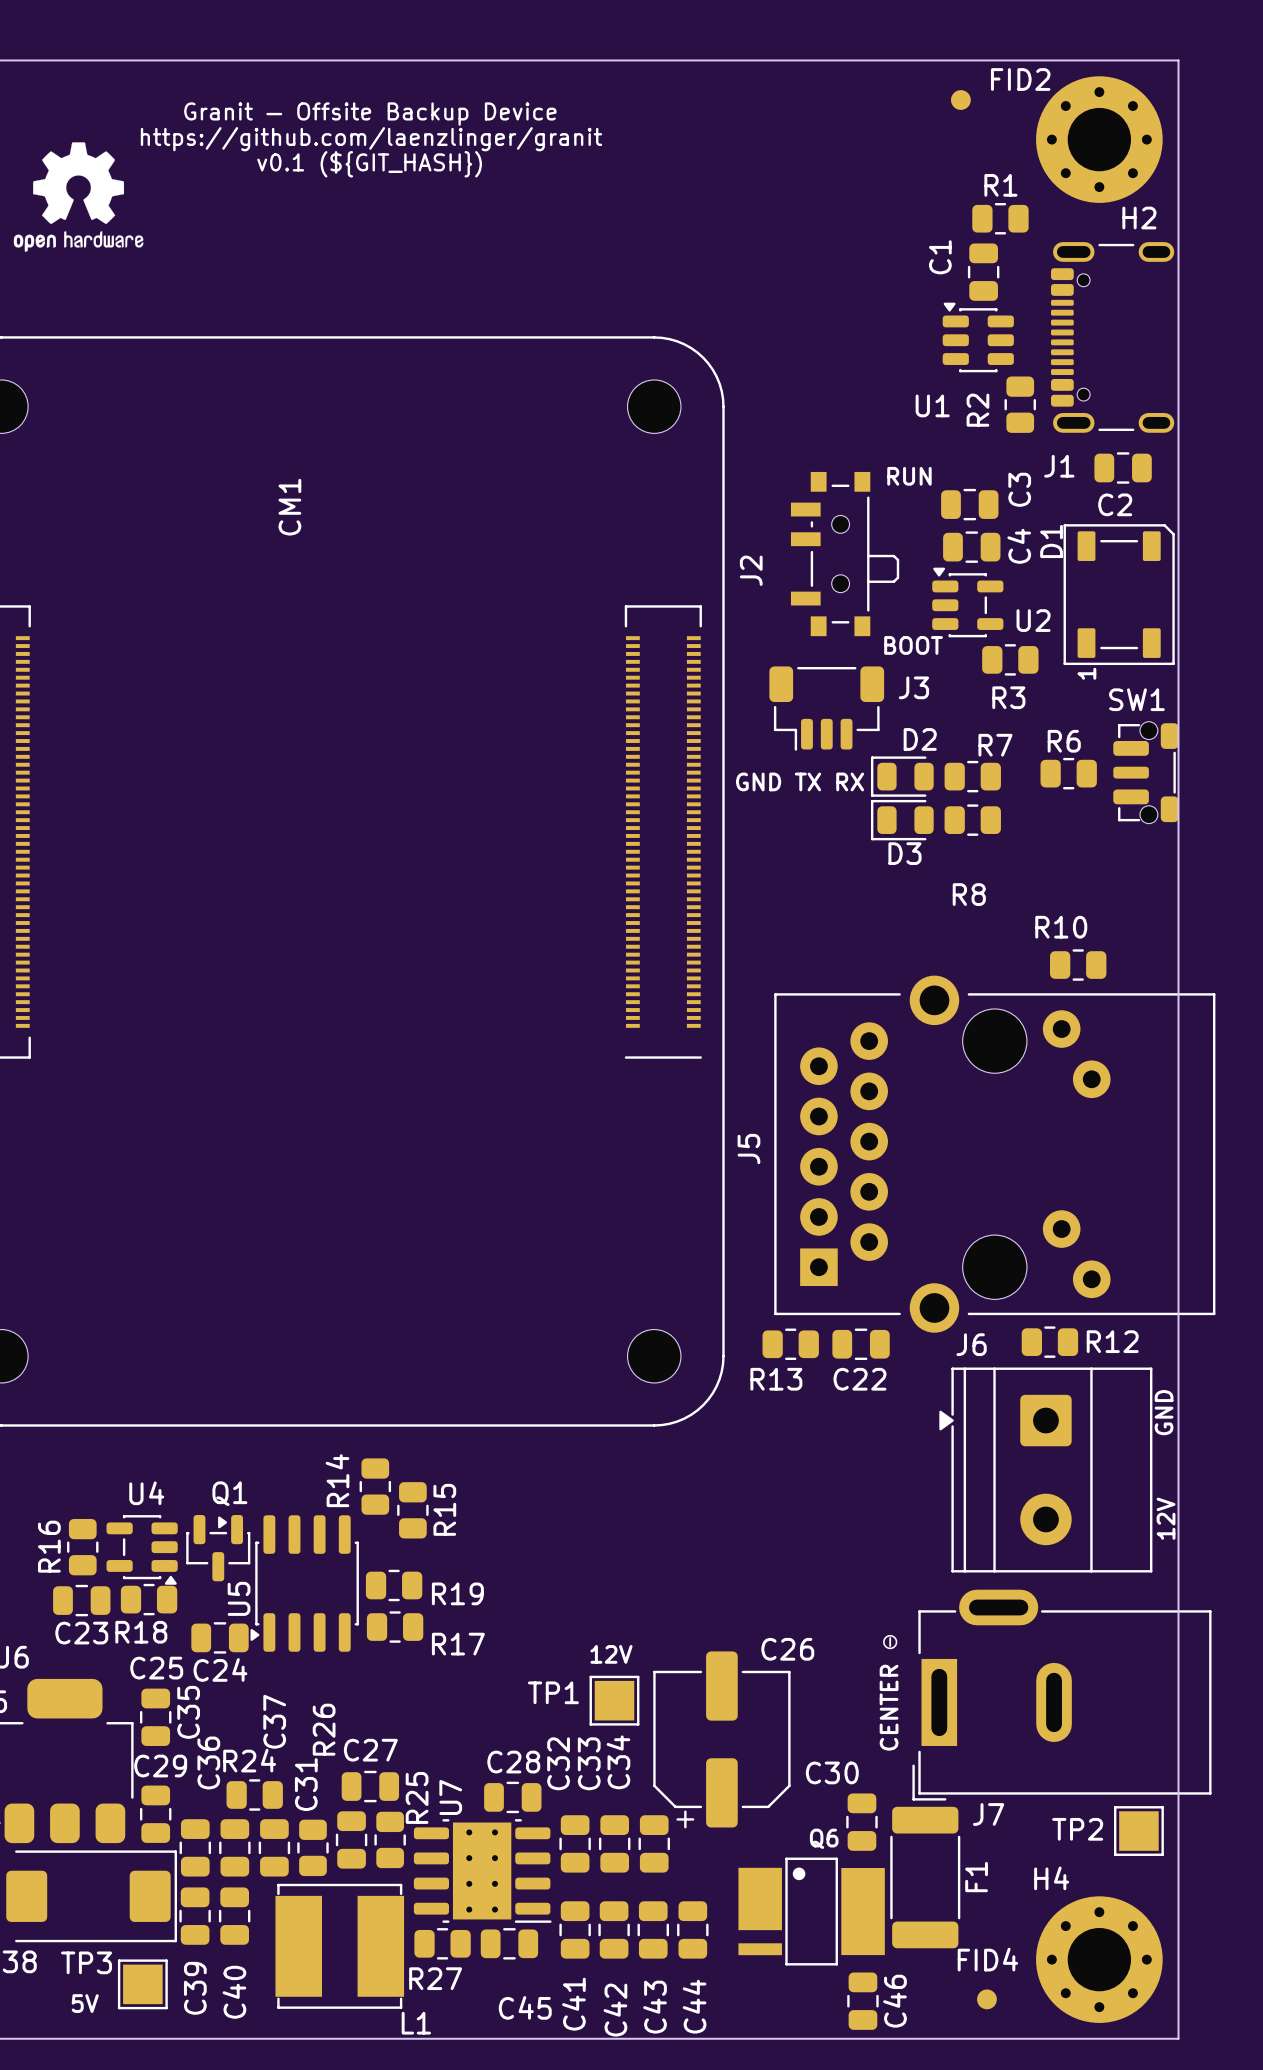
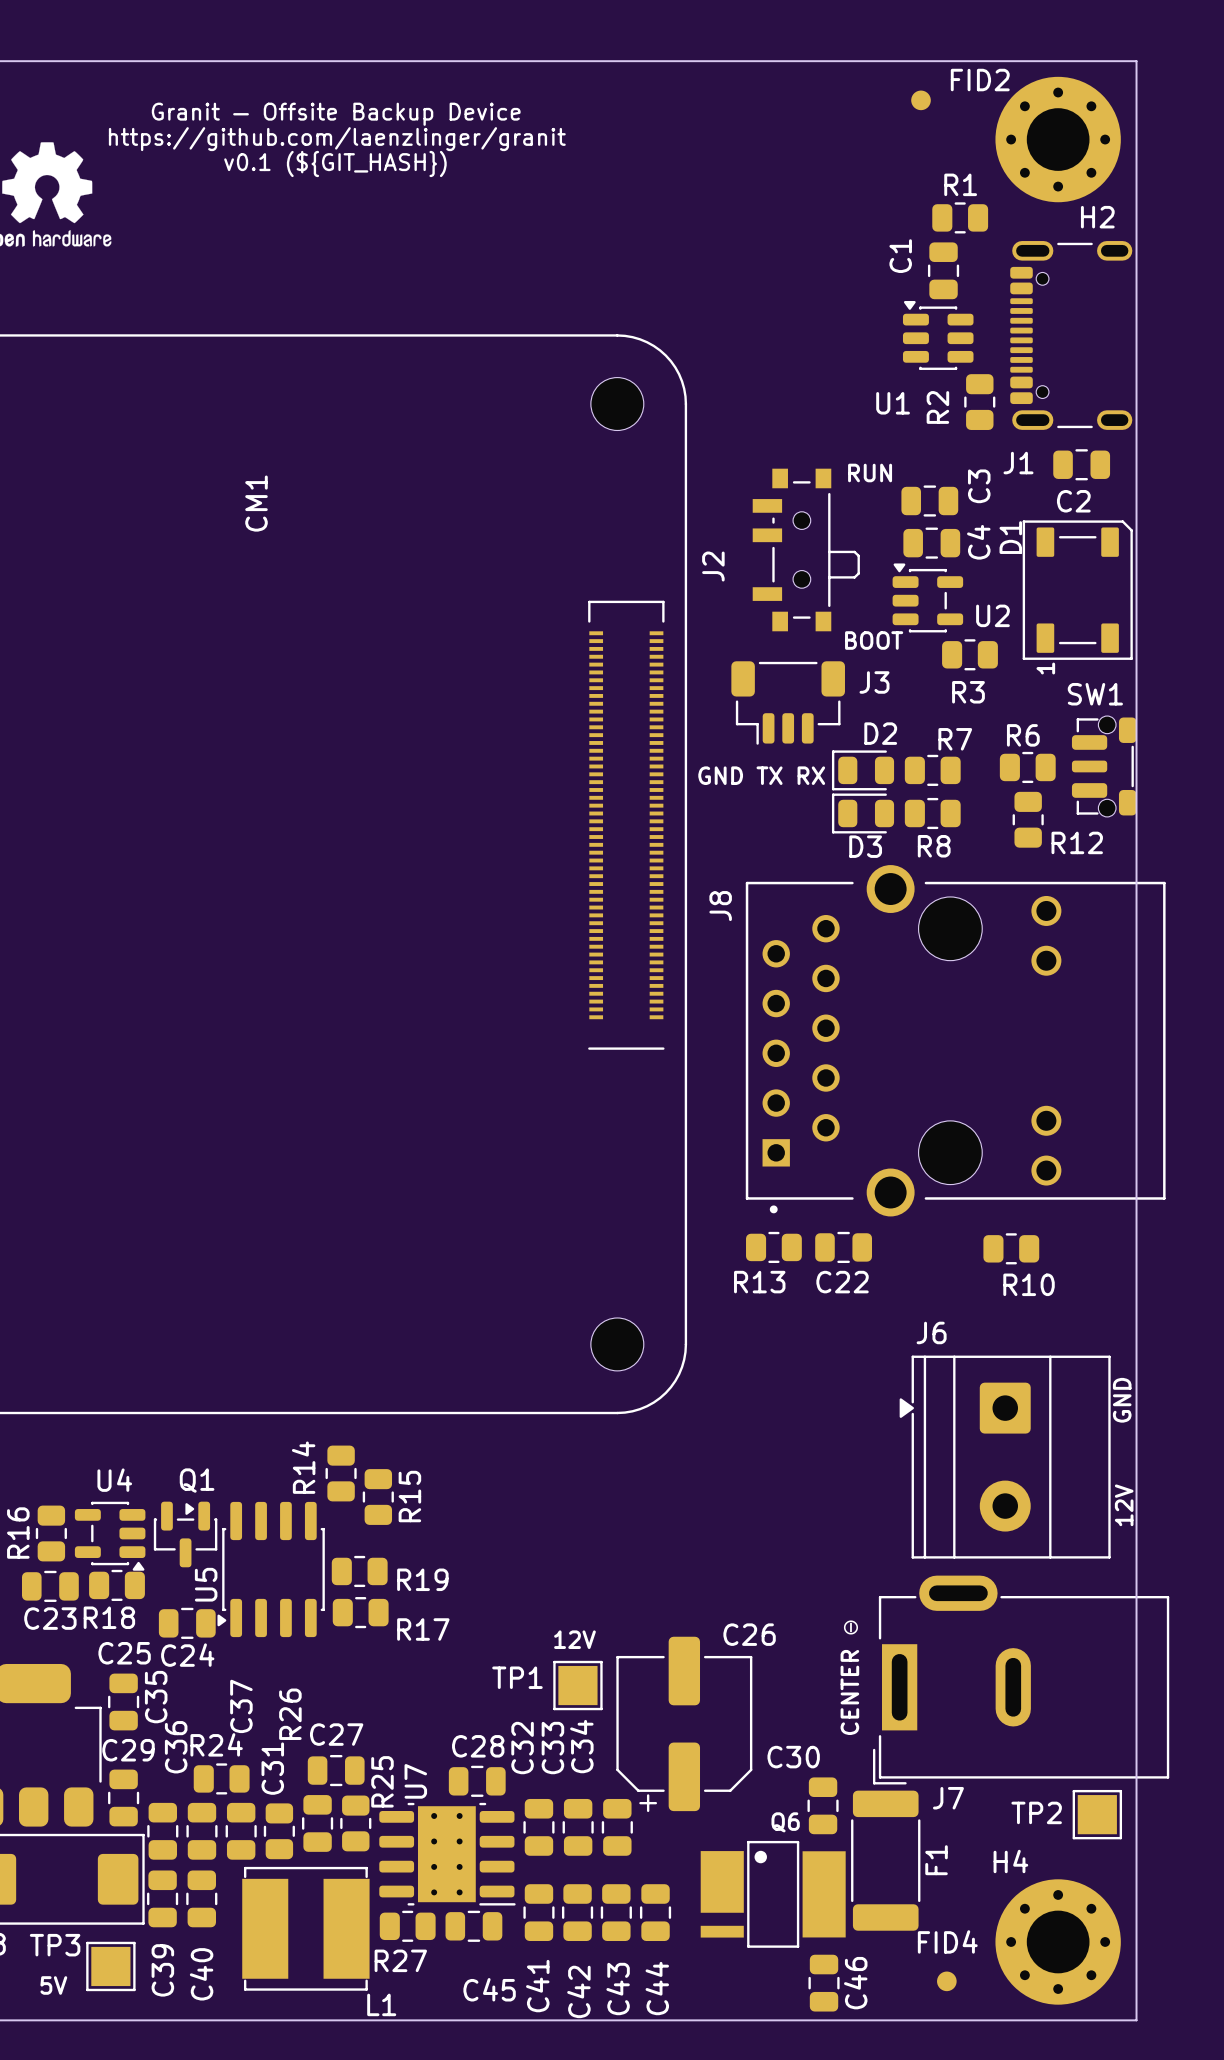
R8 name position: R8 (969, 894) -> R8 (934, 846)
R10 name position: R10 (1061, 927) -> R10 (1029, 1284)
R10 position: (1078, 965) -> (1011, 1248)
J8: none -> (955, 1040)
J5: (994, 1154) -> none
R12 rotation: 0° (1049, 1342) -> 90° clockwise (1028, 819)
R12 position: (1049, 1342) -> (1028, 819)
R13 position: (790, 1344) -> (773, 1247)
C22 position: (861, 1344) -> (843, 1247)

